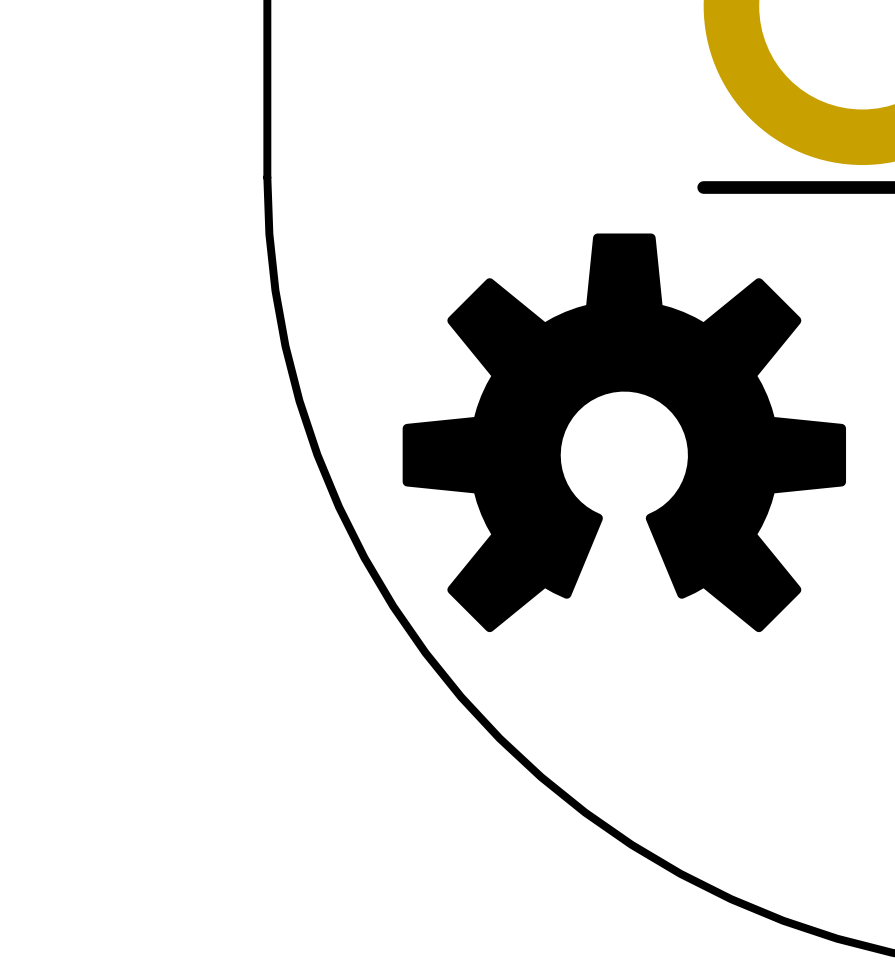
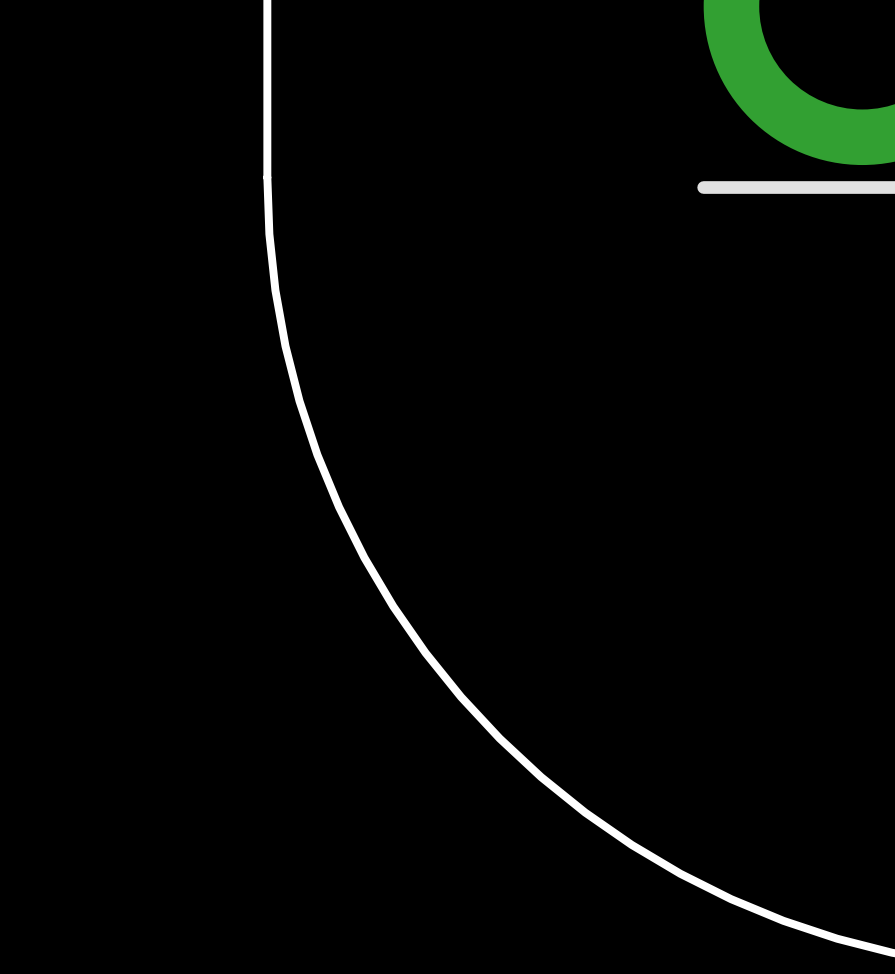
drawing: [402, 233, 847, 633] -> none

